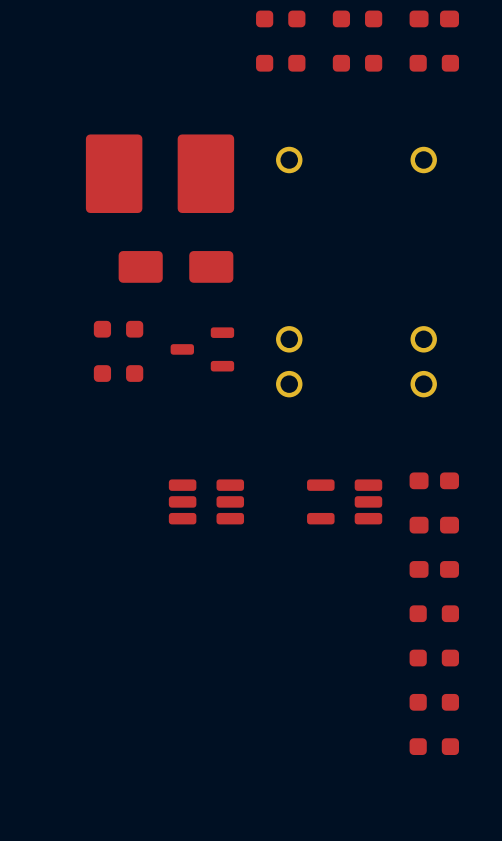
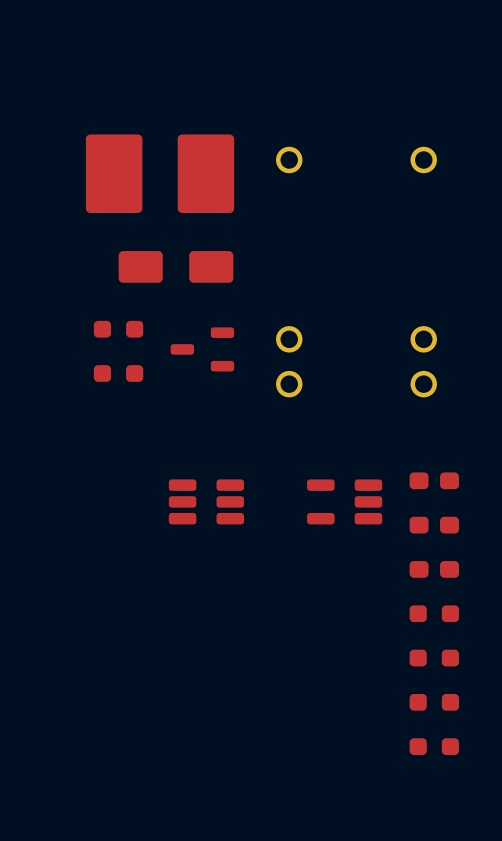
part: (280, 18) -> none
part: (357, 18) -> none
part: (434, 18) -> none
part: (280, 63) -> none
part: (357, 63) -> none
part: (434, 63) -> none

